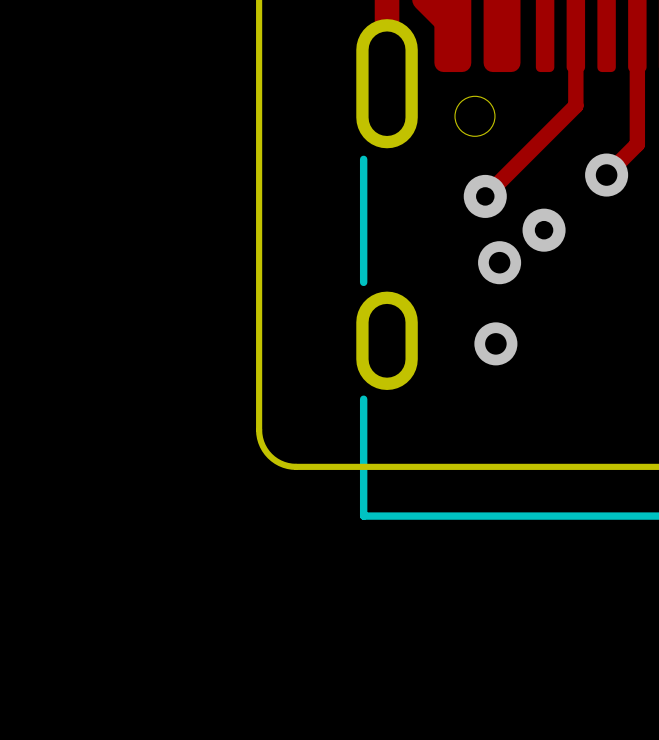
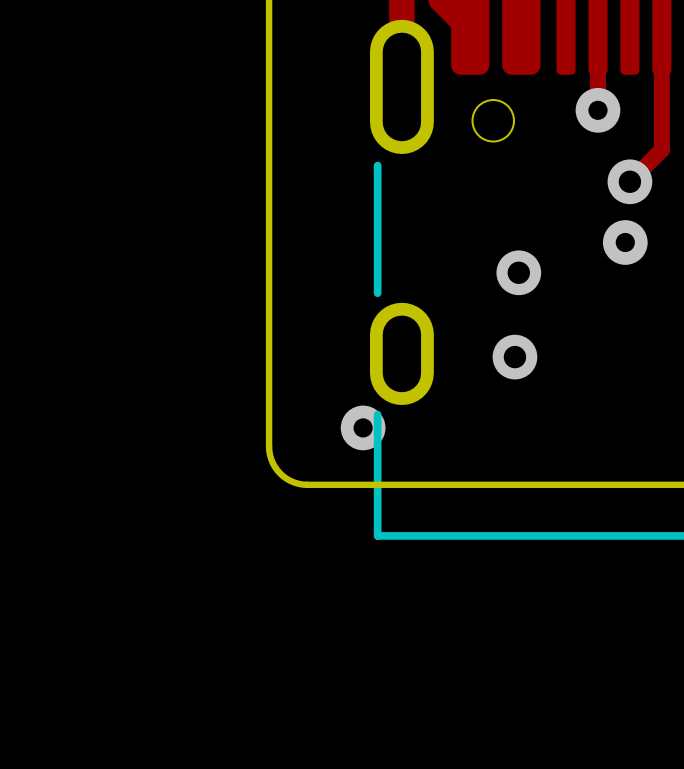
track: (575, 105) (485, 196) -> none
via: none -> (597, 110)
via: (485, 196) -> none
via position: (544, 230) -> (625, 242)
via: none -> (363, 427)

